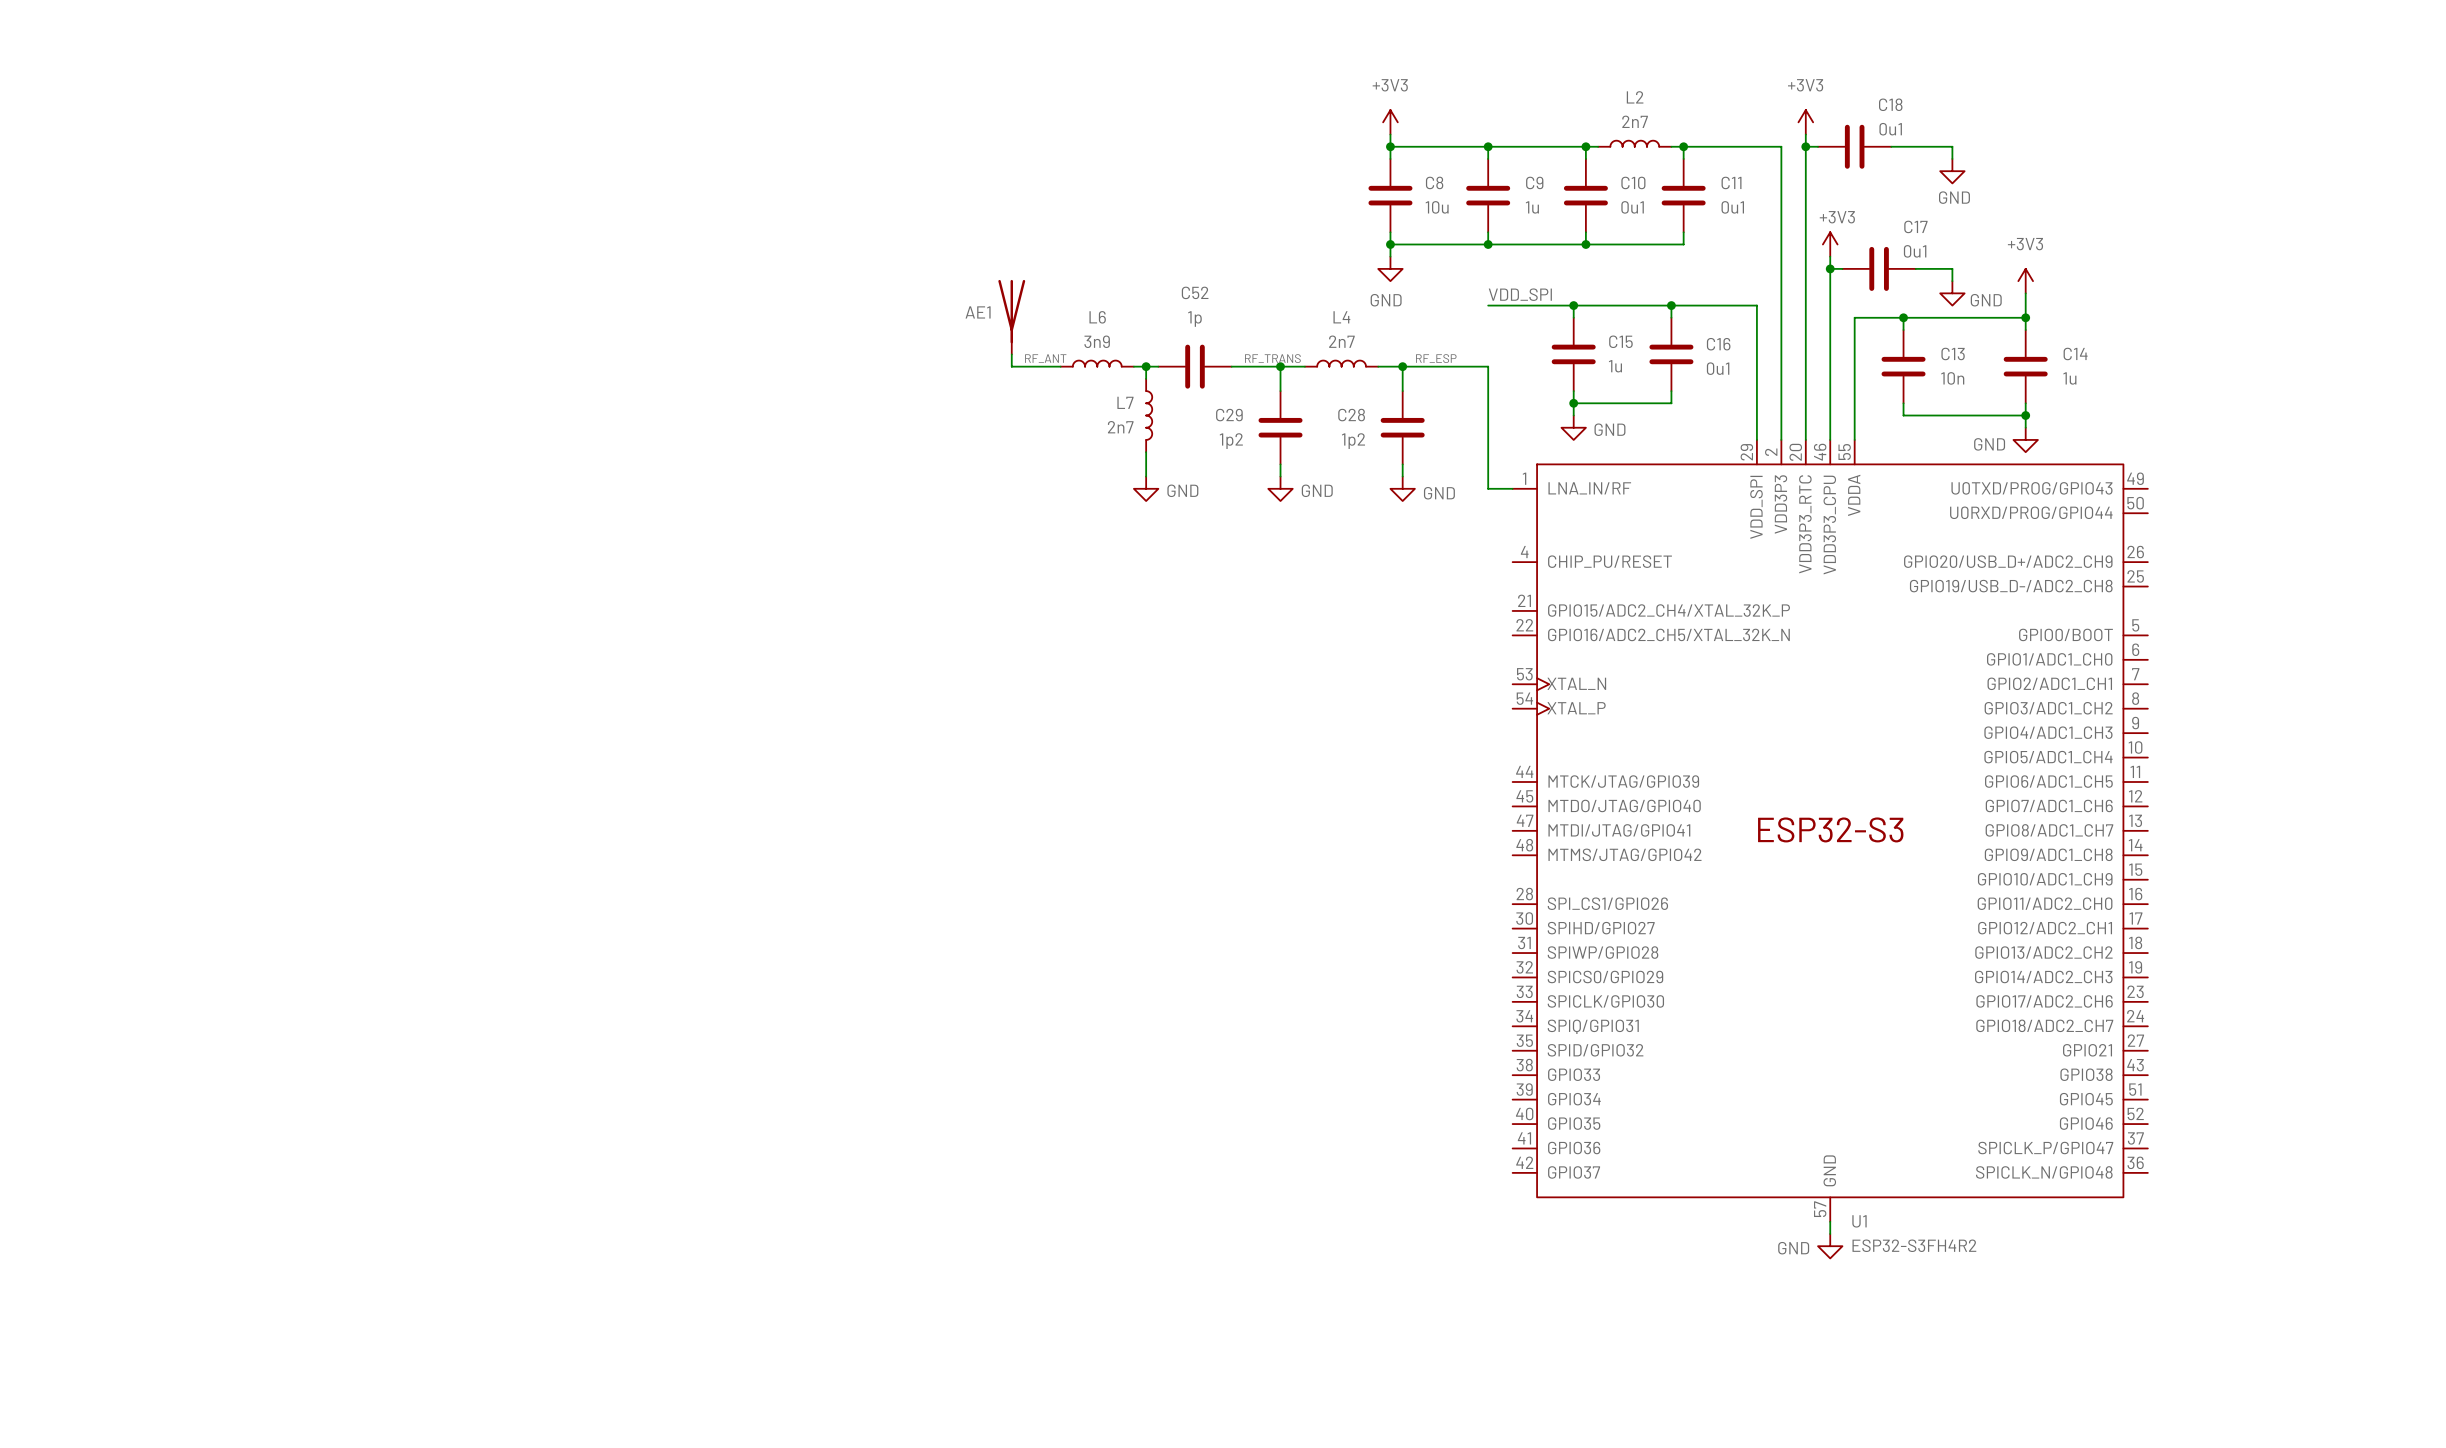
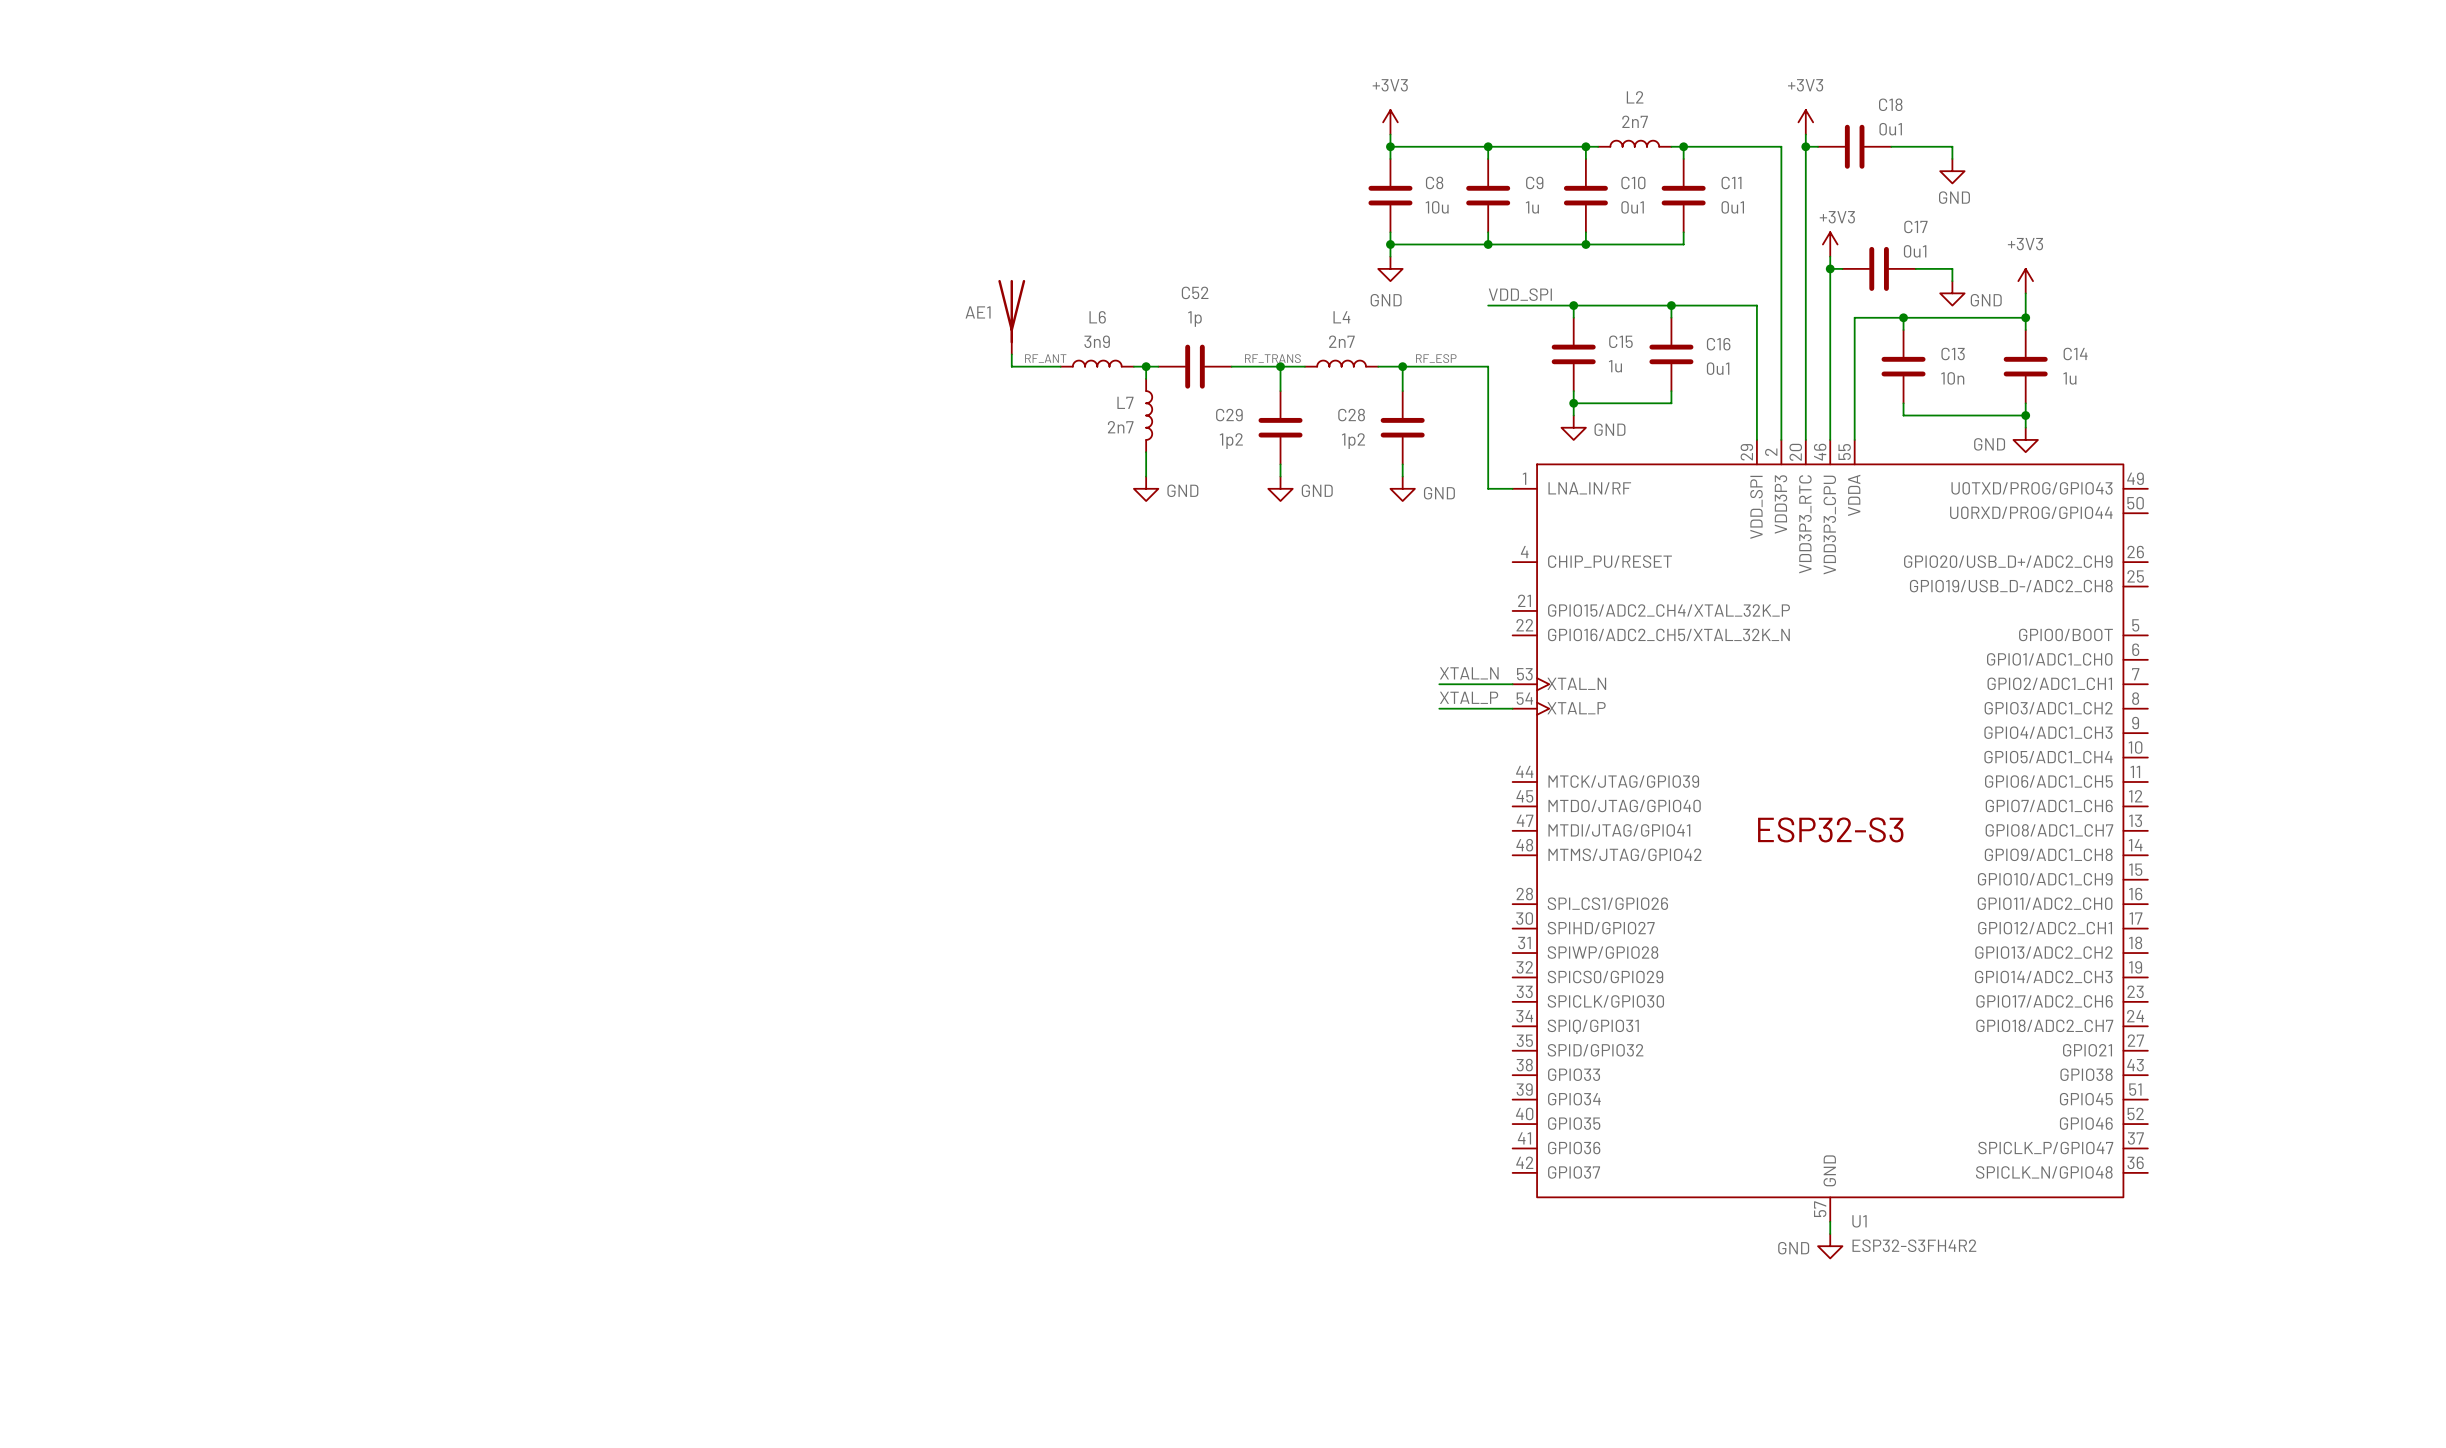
label: none -> XTAL_N (1469, 673)
wire: none -> (1439, 684) (1512, 684)
label: none -> XTAL_P (1469, 697)
wire: none -> (1439, 708) (1512, 708)

